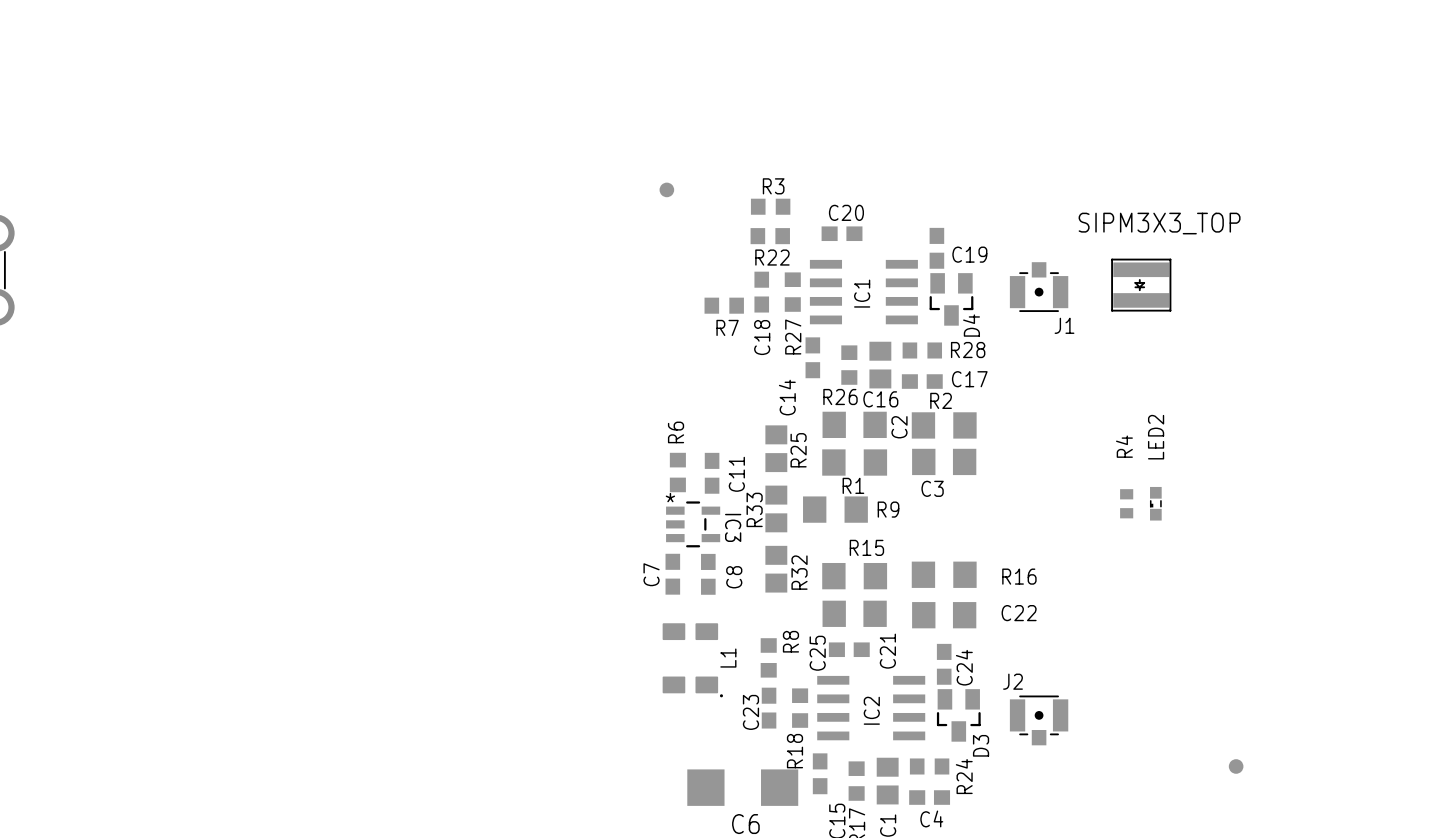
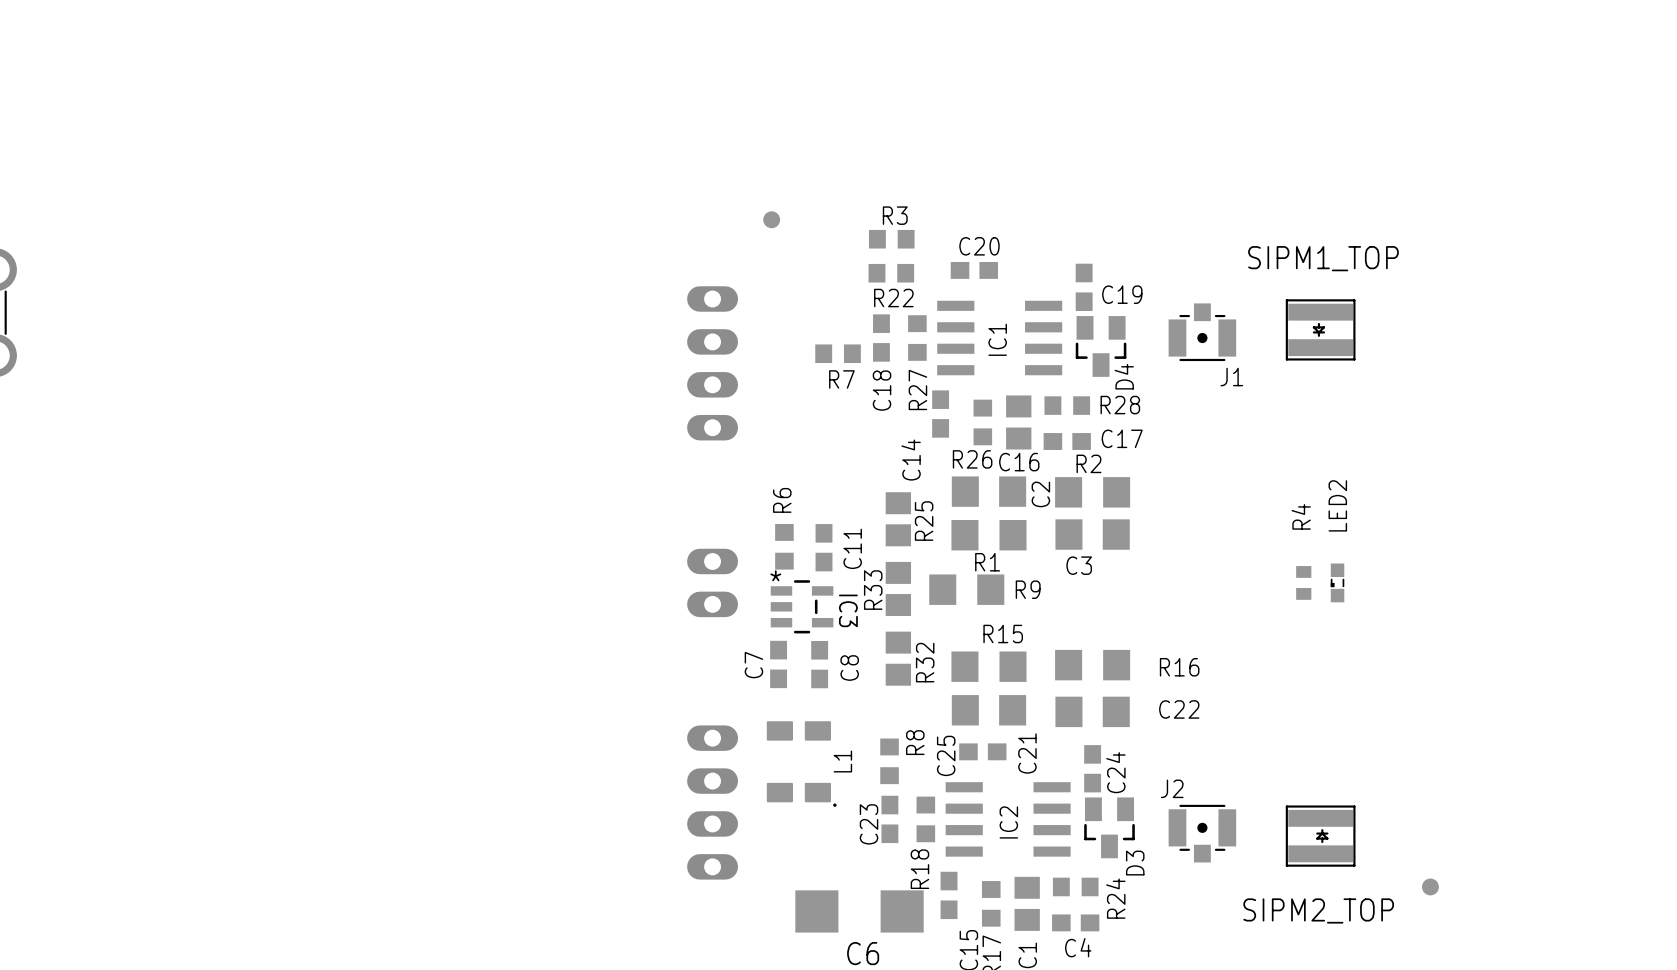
SIPM3X3_TOP name: SIPM3X3_TOP (1159, 223) -> SIPM1_TOP (1323, 258)
part: none -> (712, 363)
part: none -> (712, 582)
part: none -> (712, 802)
SIPM2_TOP: none -> (1320, 836)

